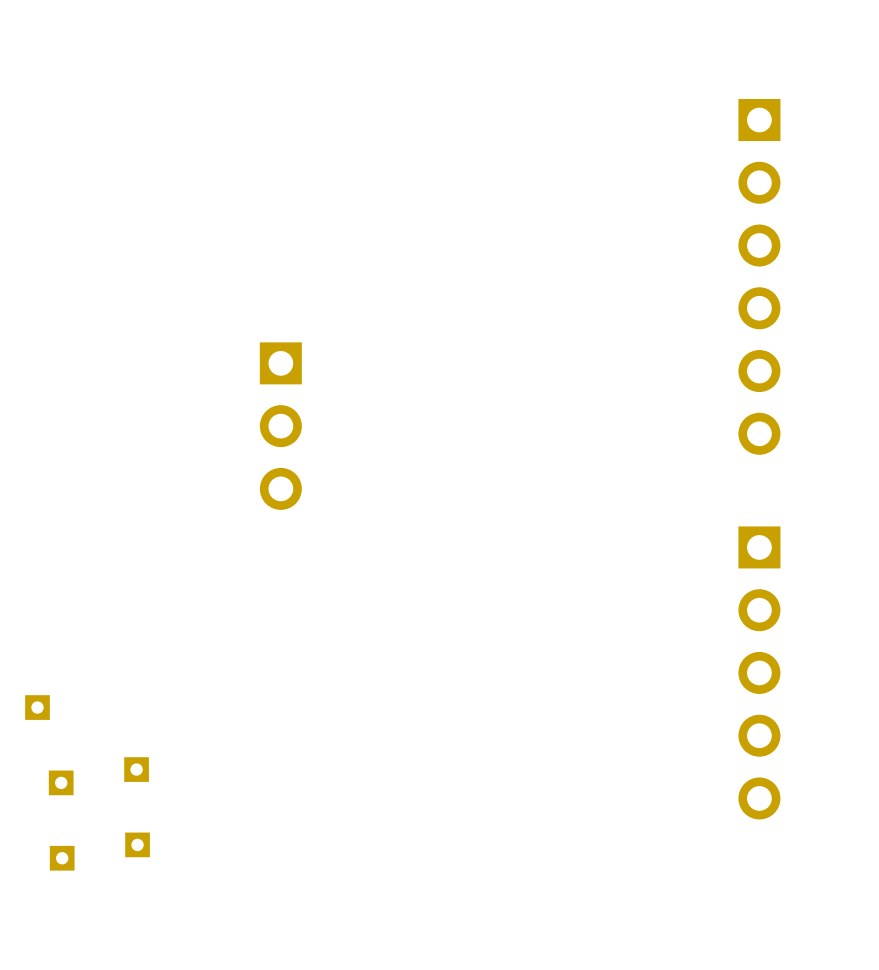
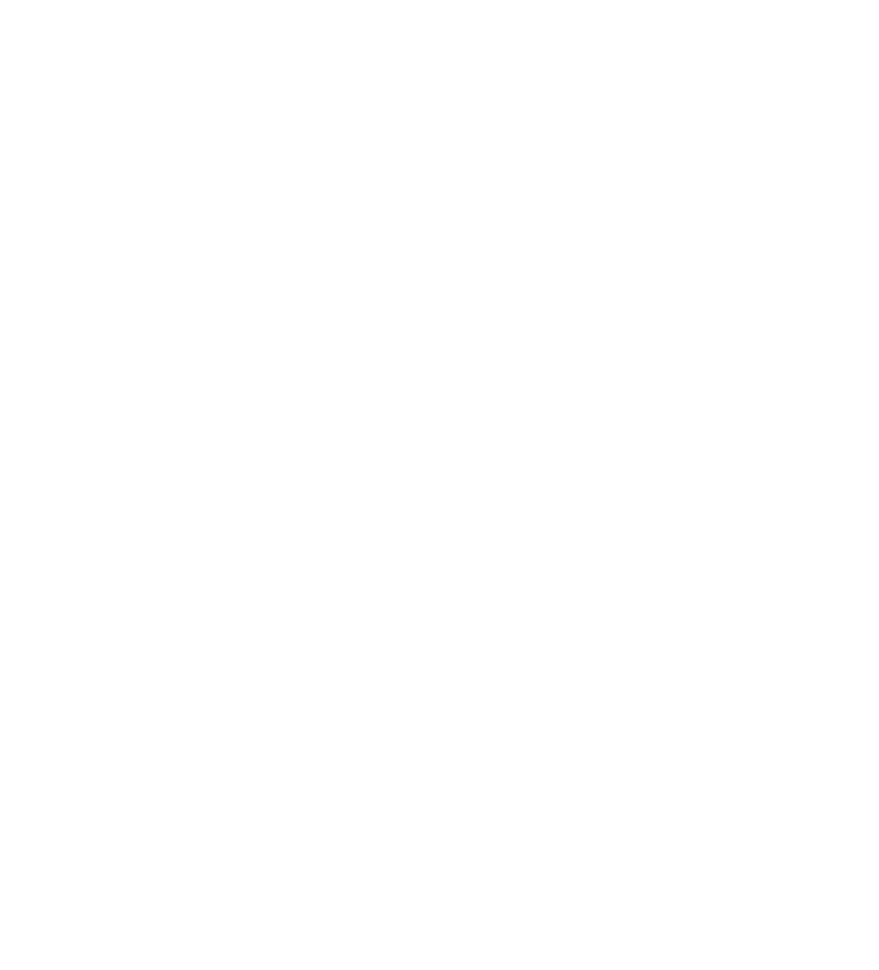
part: (759, 276) -> none
part: (280, 426) -> none
part: (759, 672) -> none
part: (37, 707) -> none
part: (136, 769) -> none
part: (61, 782) -> none
part: (137, 844) -> none
part: (62, 858) -> none

